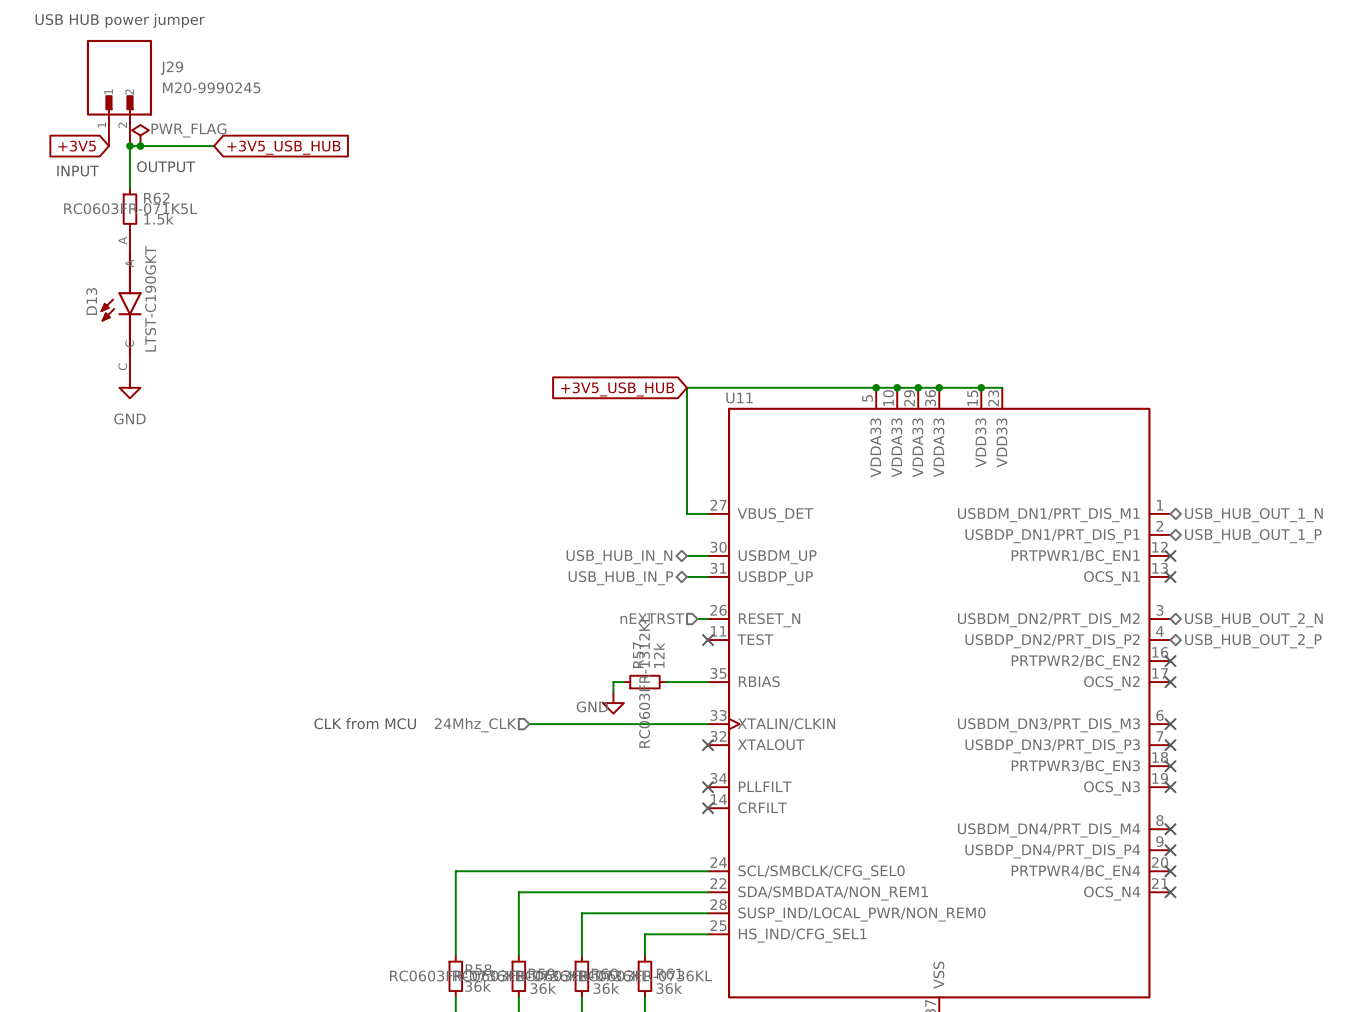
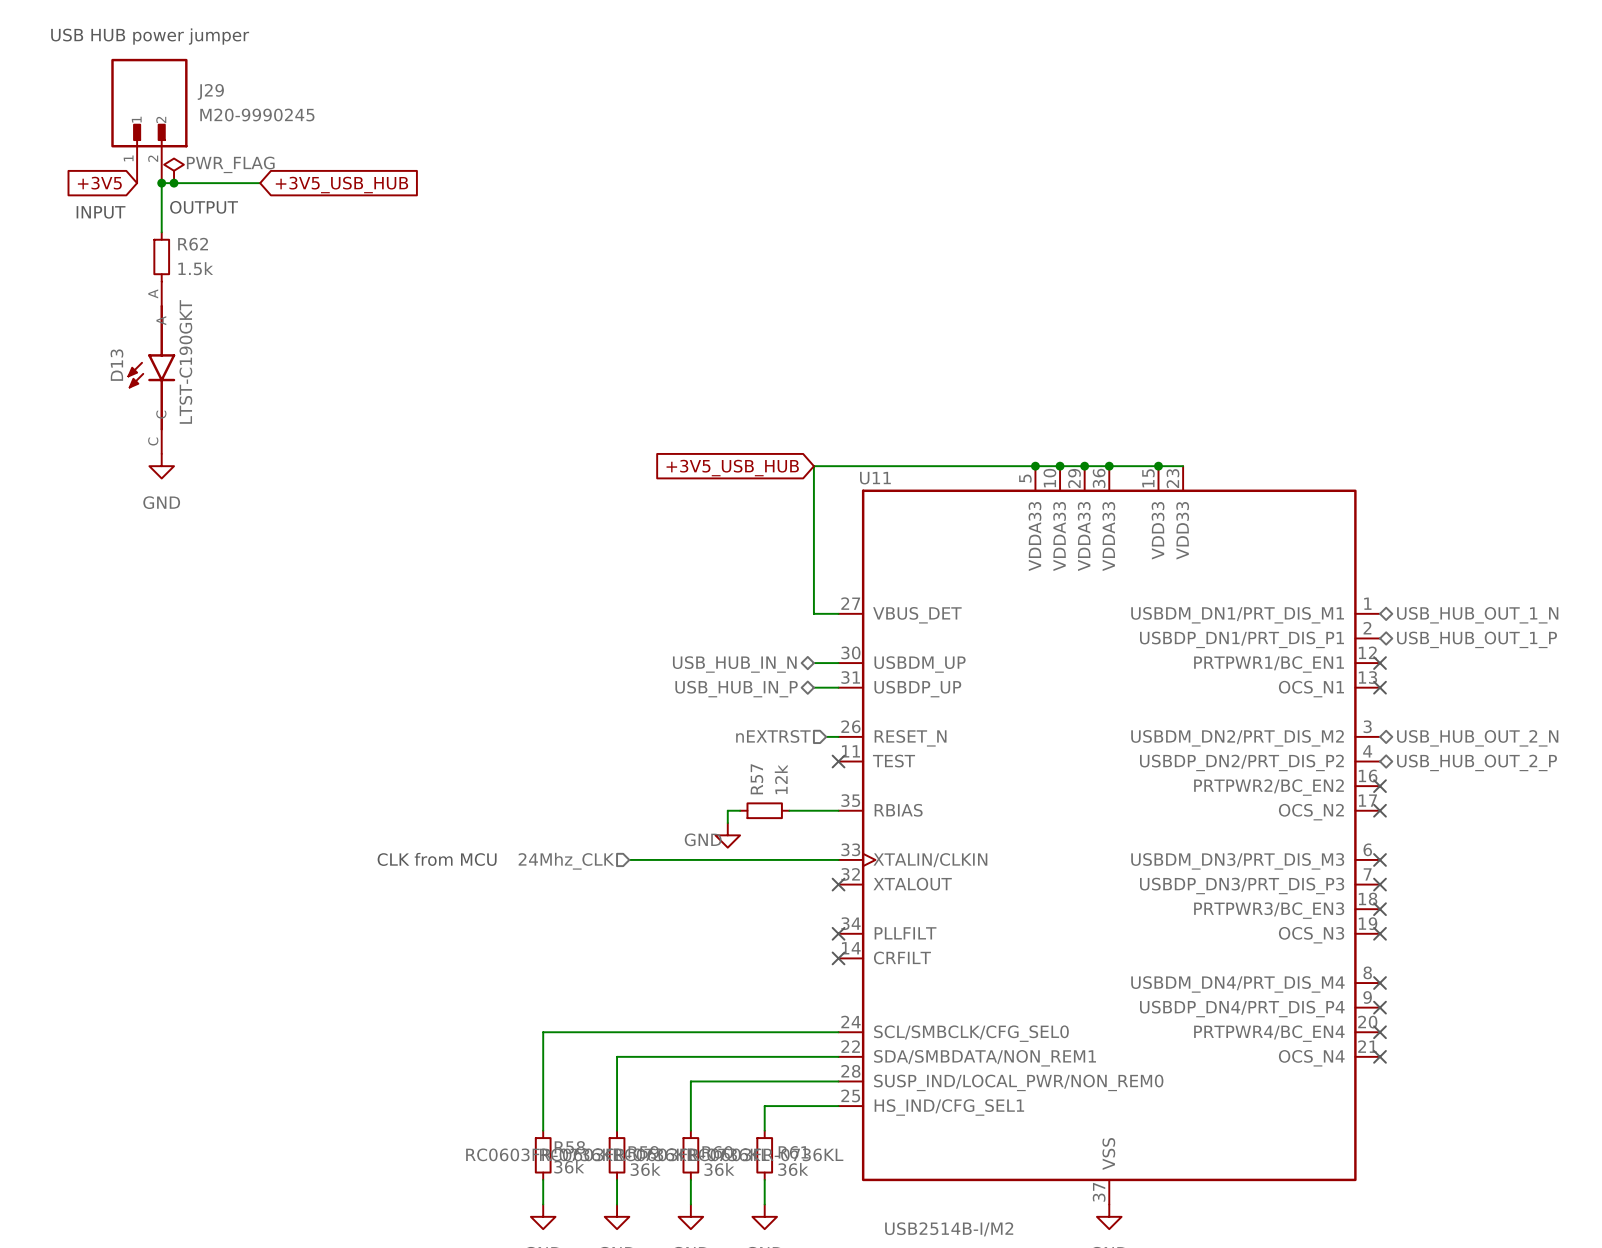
R62 text: RC0603FR-071K5L (130, 208) -> none
R57 text: RC0603FR-1312KL (644, 681) -> none

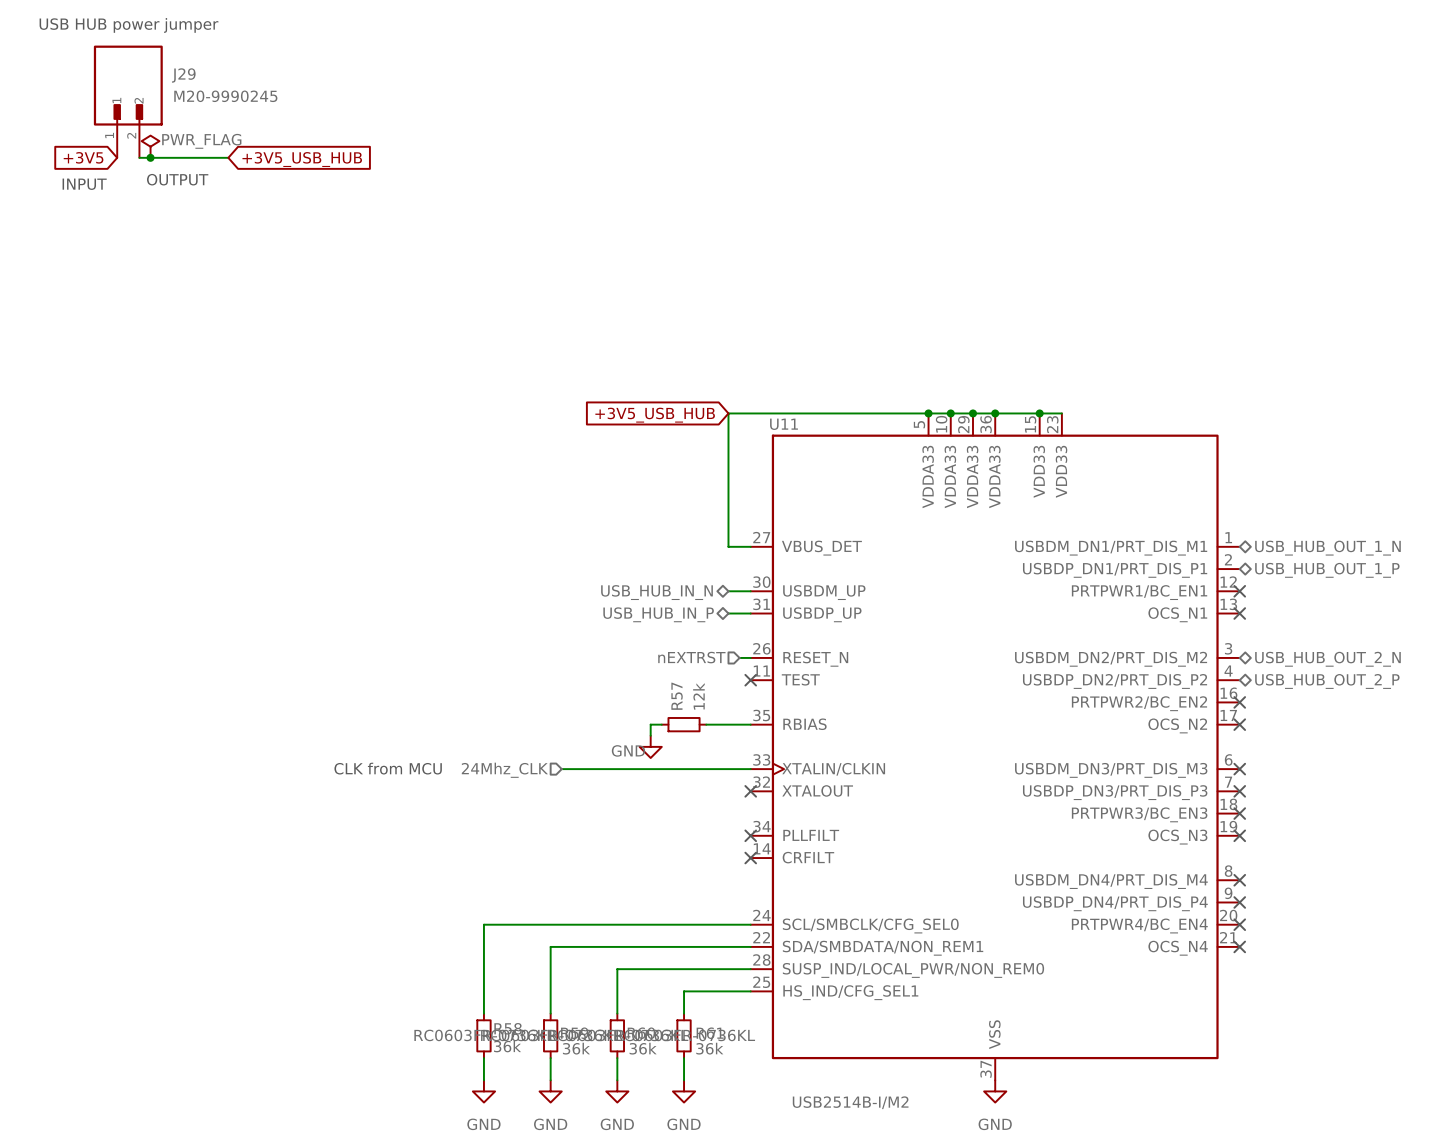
wire: (161, 183) (161, 232) -> none
junction: (161, 183) -> none
R62: 1.5k (161, 256) -> none
D13: LTST-C190GKT (151, 367) -> none
power symbol: GND (161, 466) -> none

